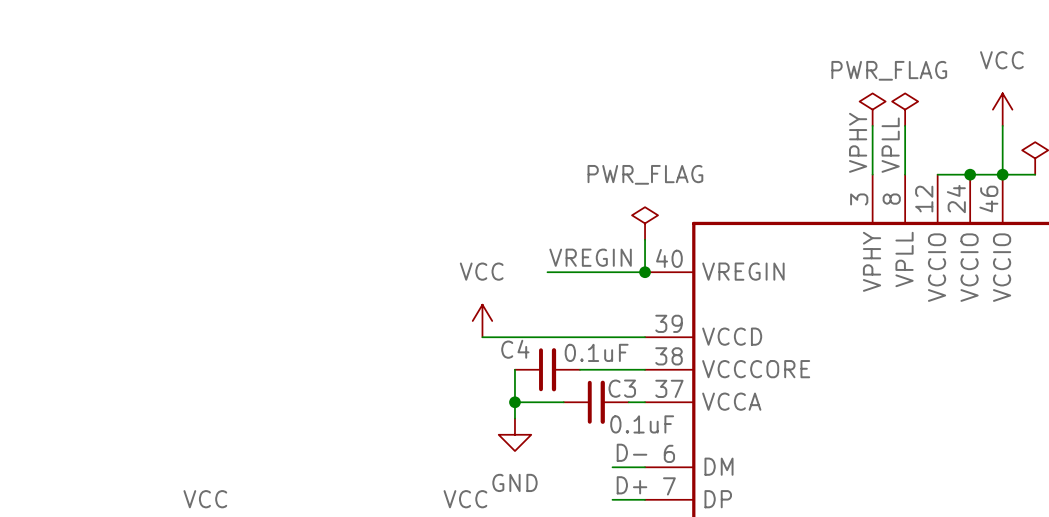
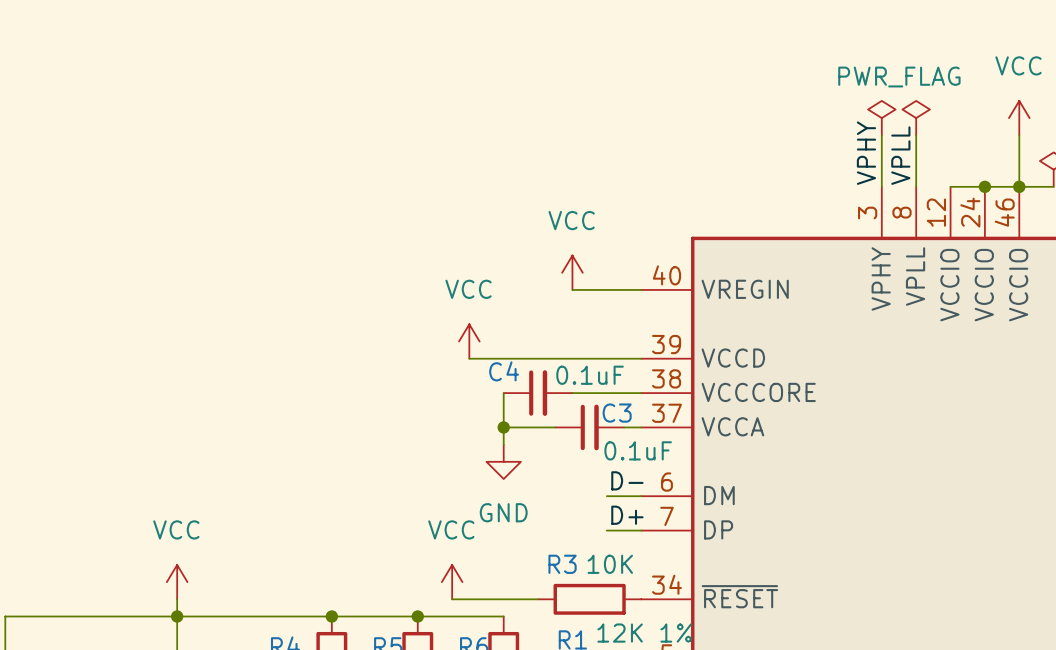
power symbol: PWR_FLAG (645, 223) -> none
wire: (645, 239) (645, 272) -> none
power symbol: none -> VCC (572, 272)
label: VREGIN (590, 257) -> none
wire: (547, 272) (580, 272) -> none
junction: (645, 272) -> none

